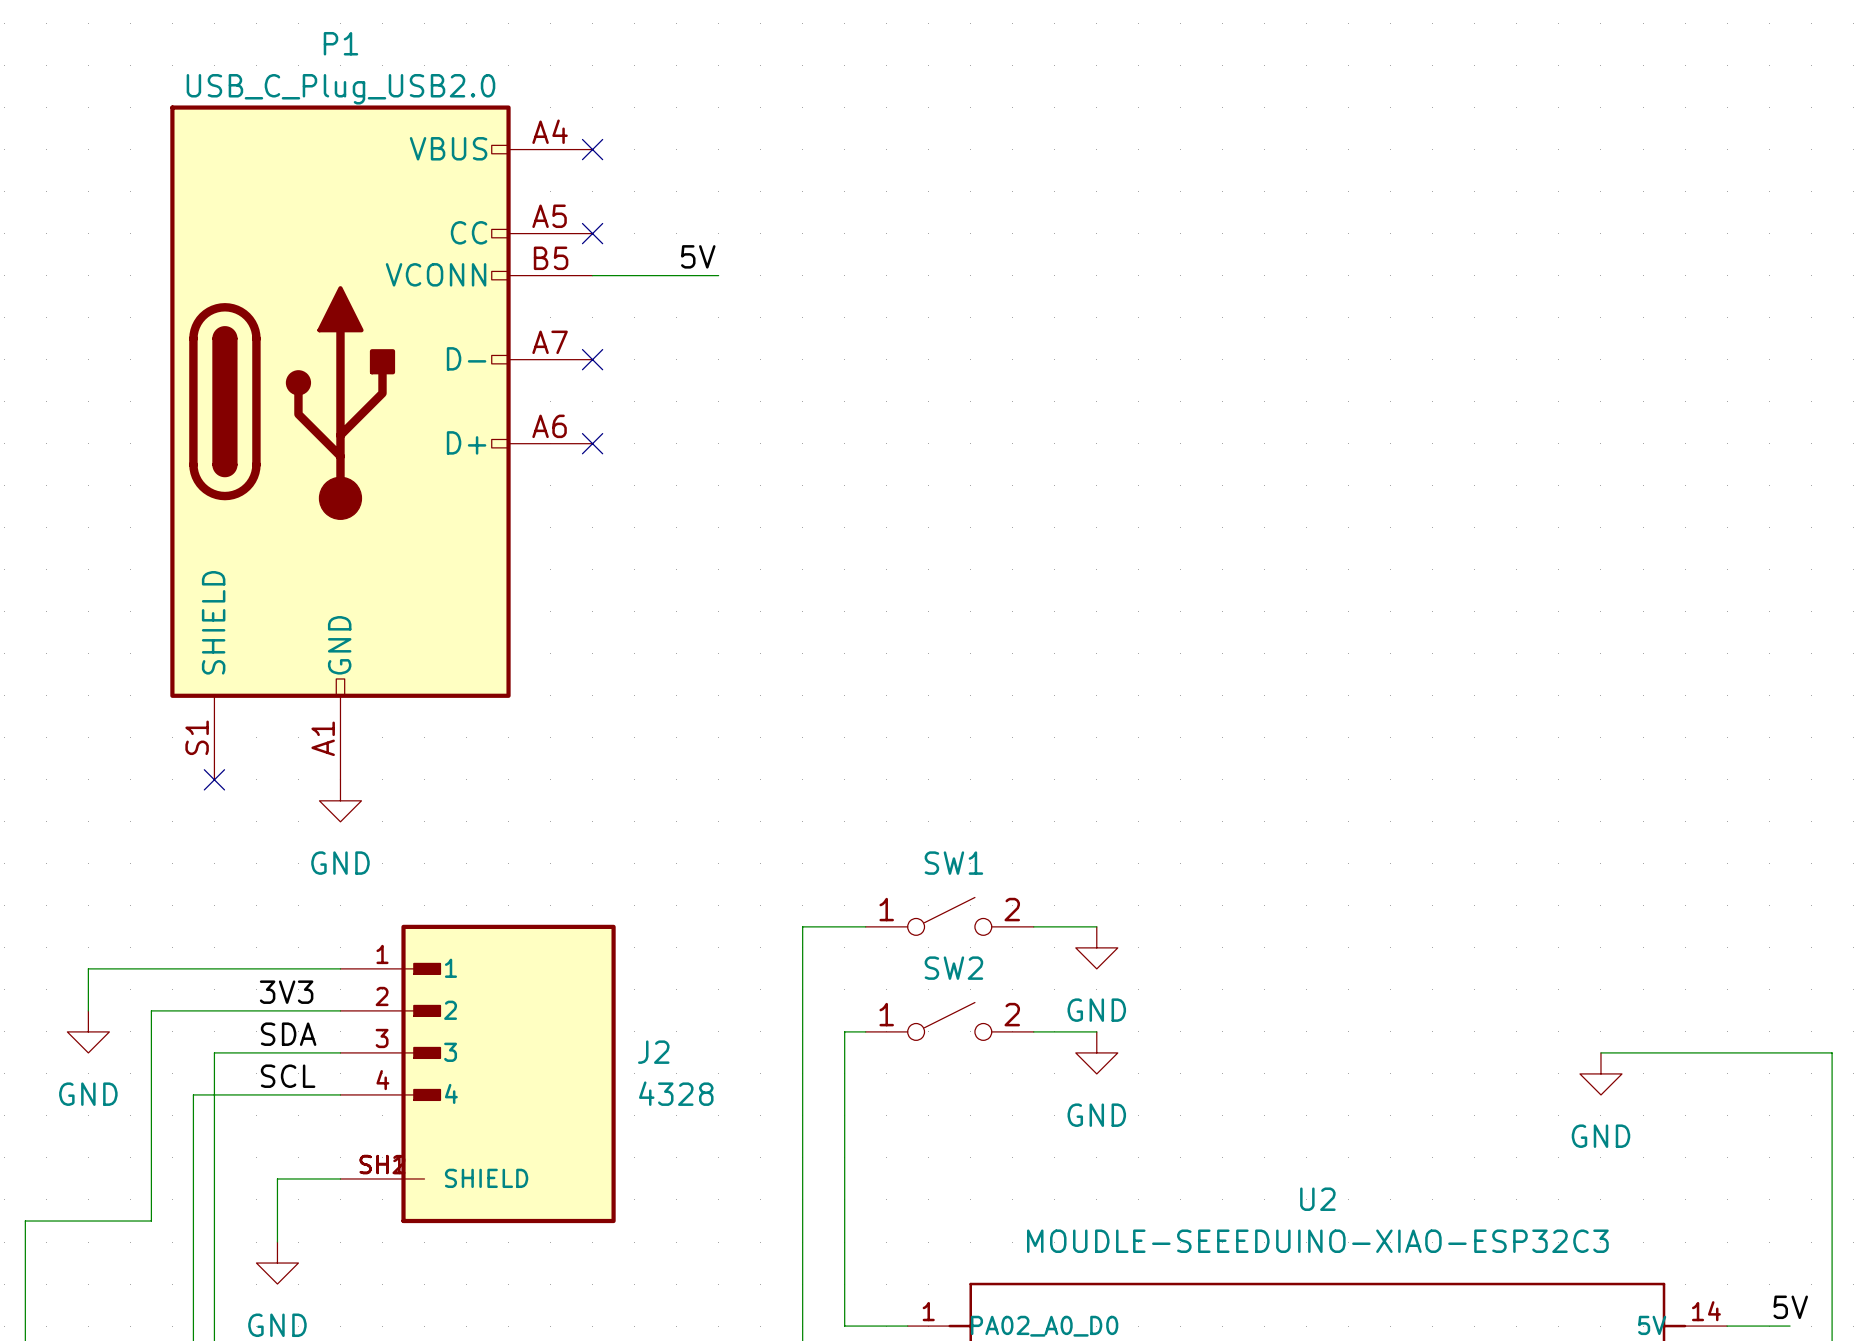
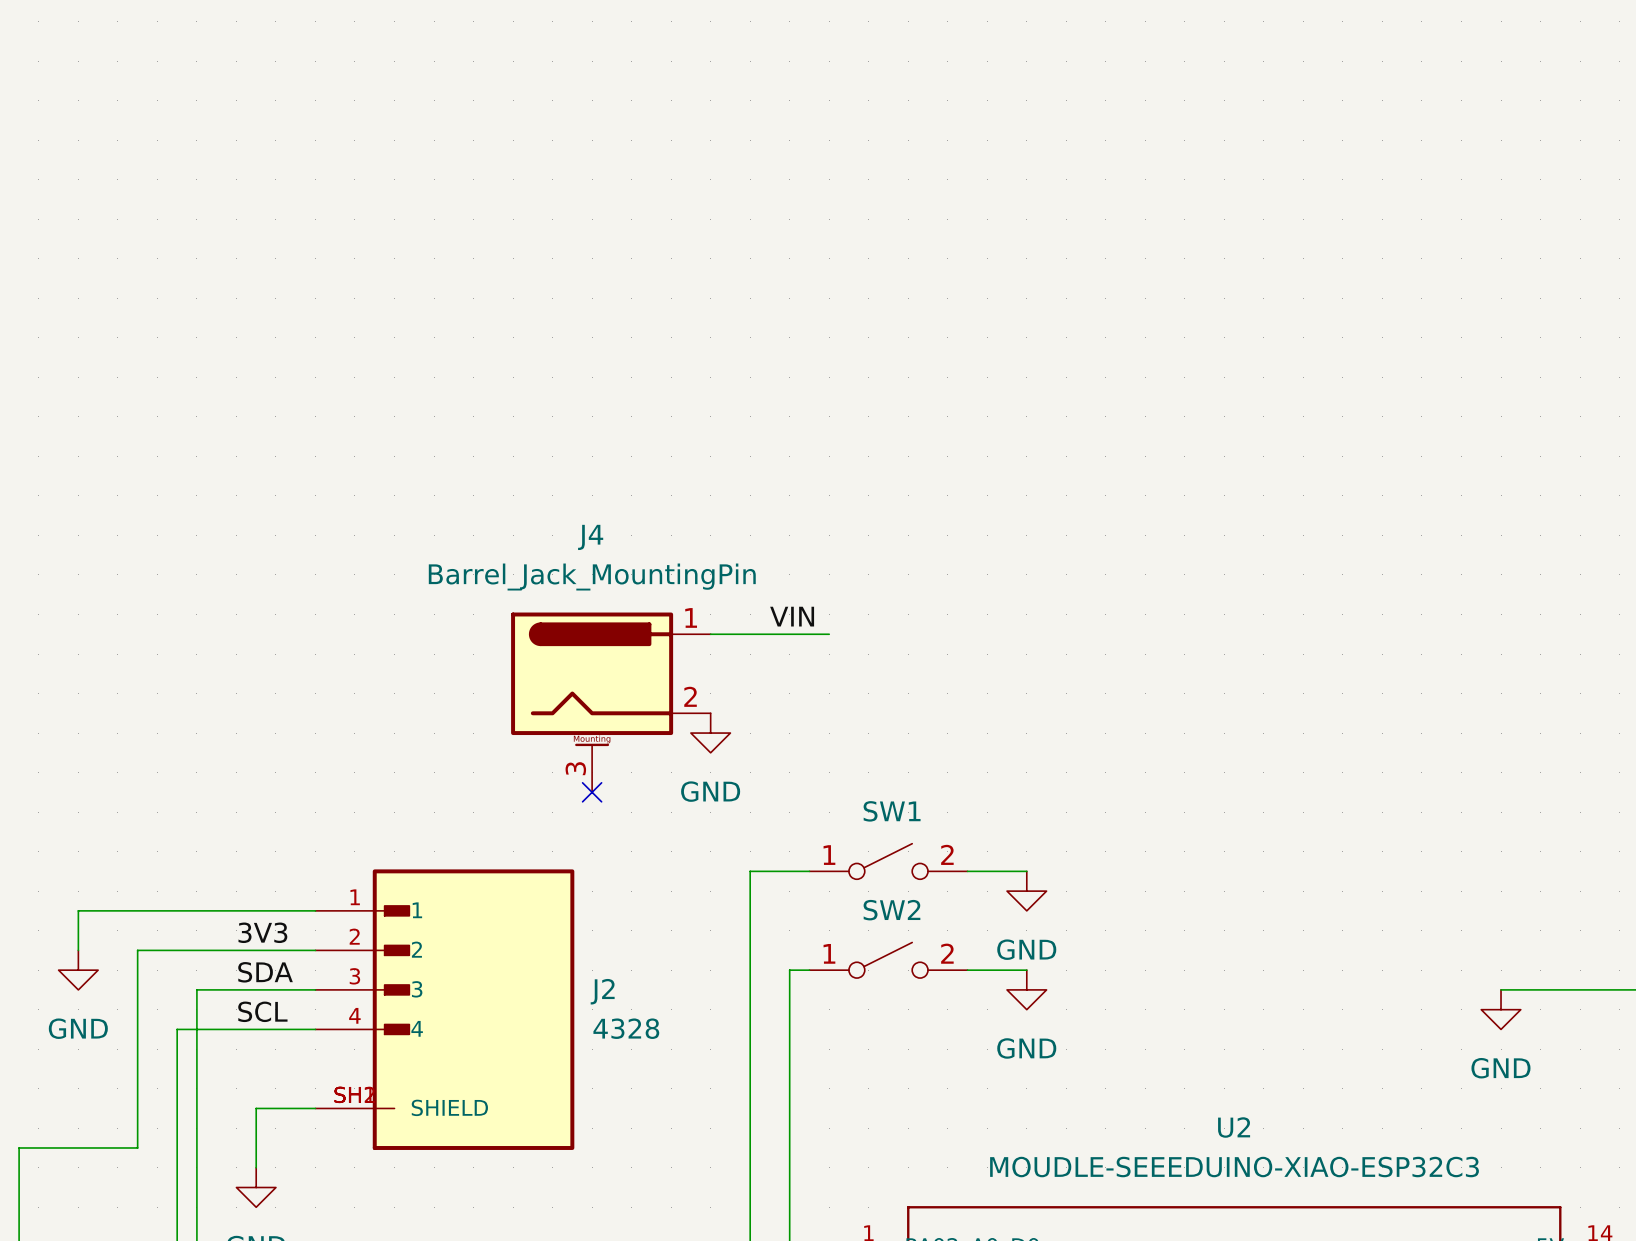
no-connect mark: (592, 149) -> none
no-connect mark: (592, 233) -> none
label: 5V (698, 256) -> none
wire: (592, 275) (718, 275) -> none
no-connect mark: (592, 359) -> none
P1: USB_C_Plug_USB2.0 (381, 442) -> none
no-connect mark: (592, 443) -> none
label: none -> VIN (792, 616)
wire: none -> (710, 634) (829, 634)
J4: none -> Barrel_Jack_MountingPin (610, 702)
no-connect mark: (214, 779) -> none
power symbol: none -> GND (710, 733)
power symbol: GND (340, 800) -> none
no-connect mark: none -> (592, 792)

